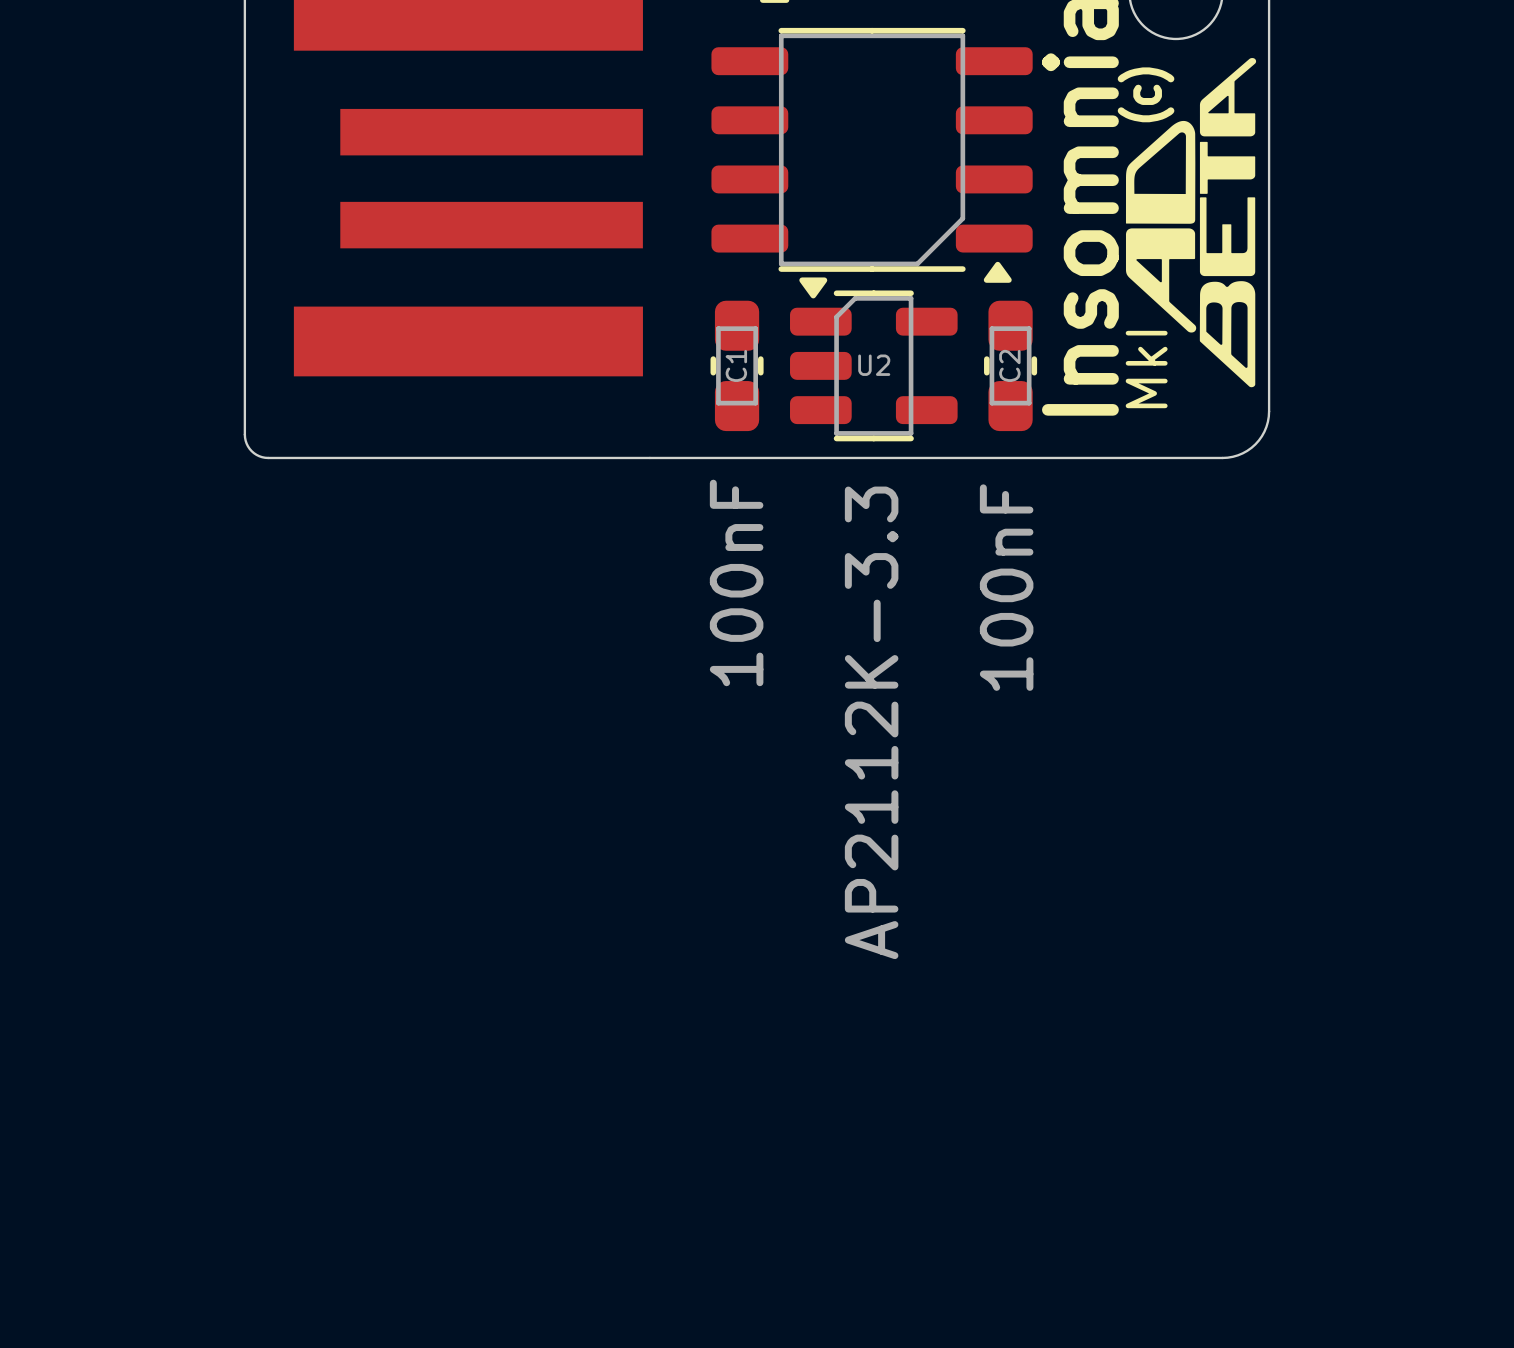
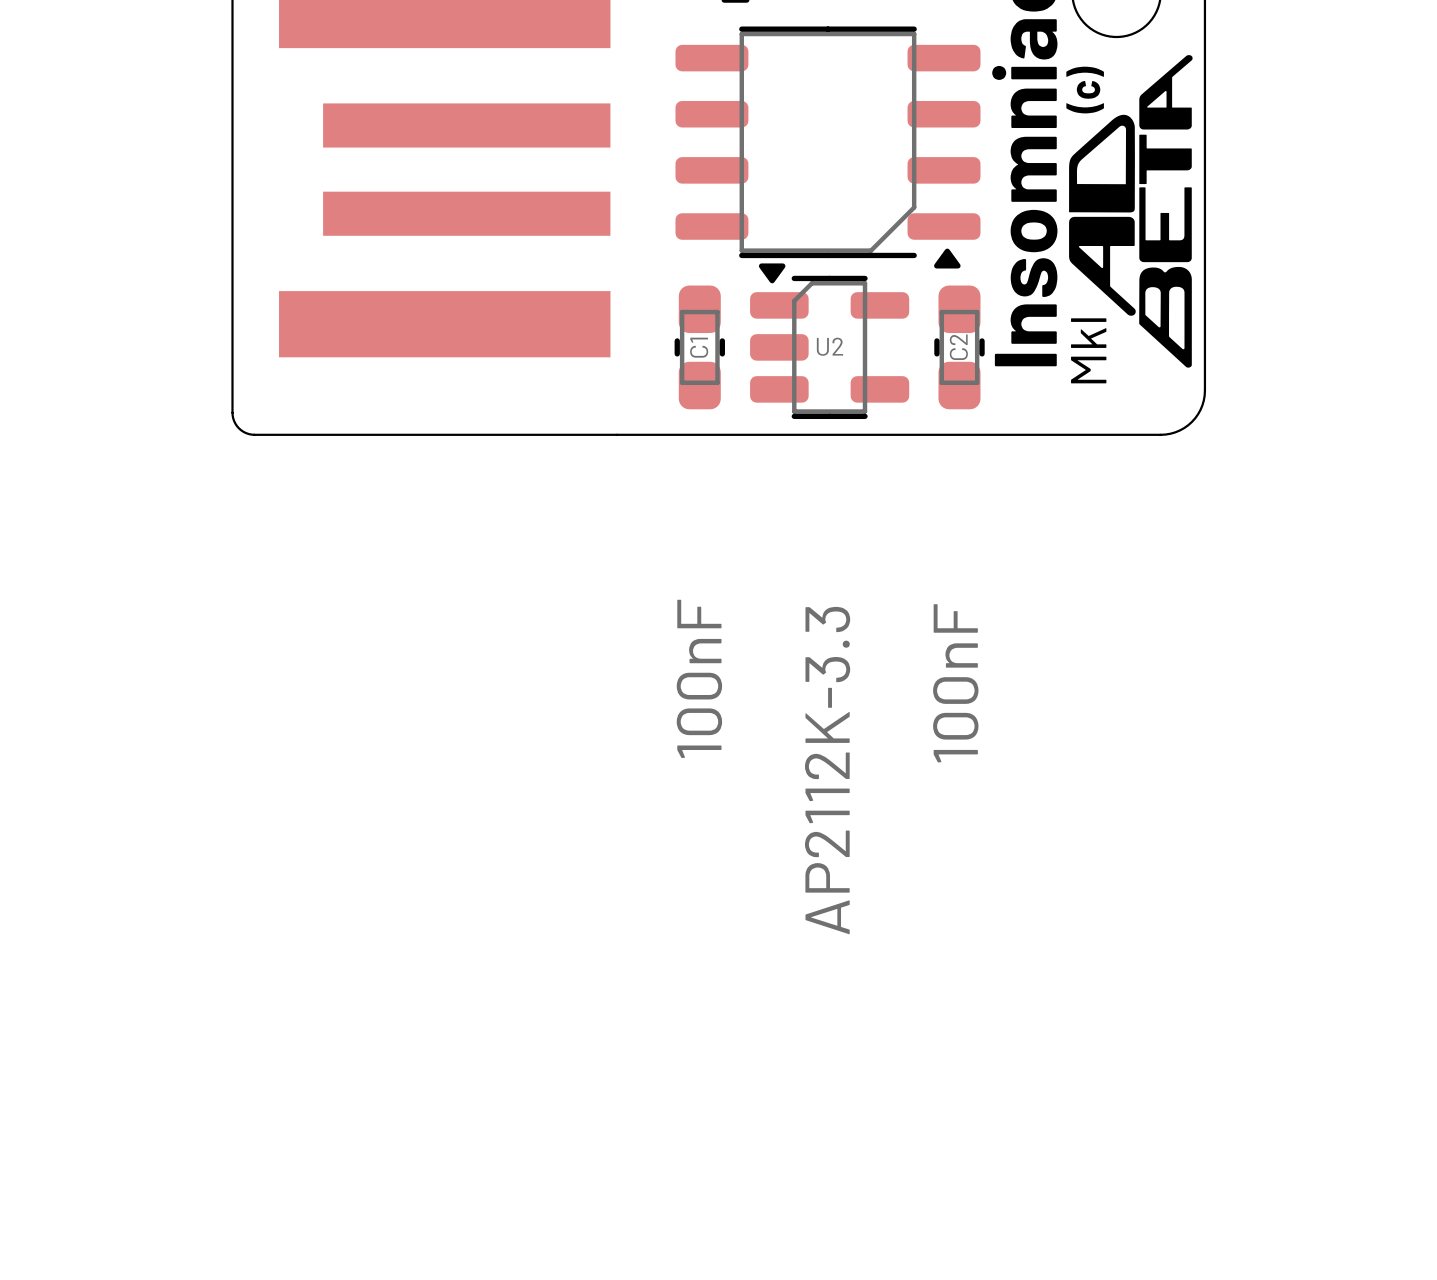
C1 value position: 100nF (736, 582) -> 100nF (699, 678)
C2 value position: 100nF (1006, 587) -> 100nF (955, 683)
U2 value position: AP2112K-3.3 (871, 722) -> AP2112K-3.3 (827, 770)

